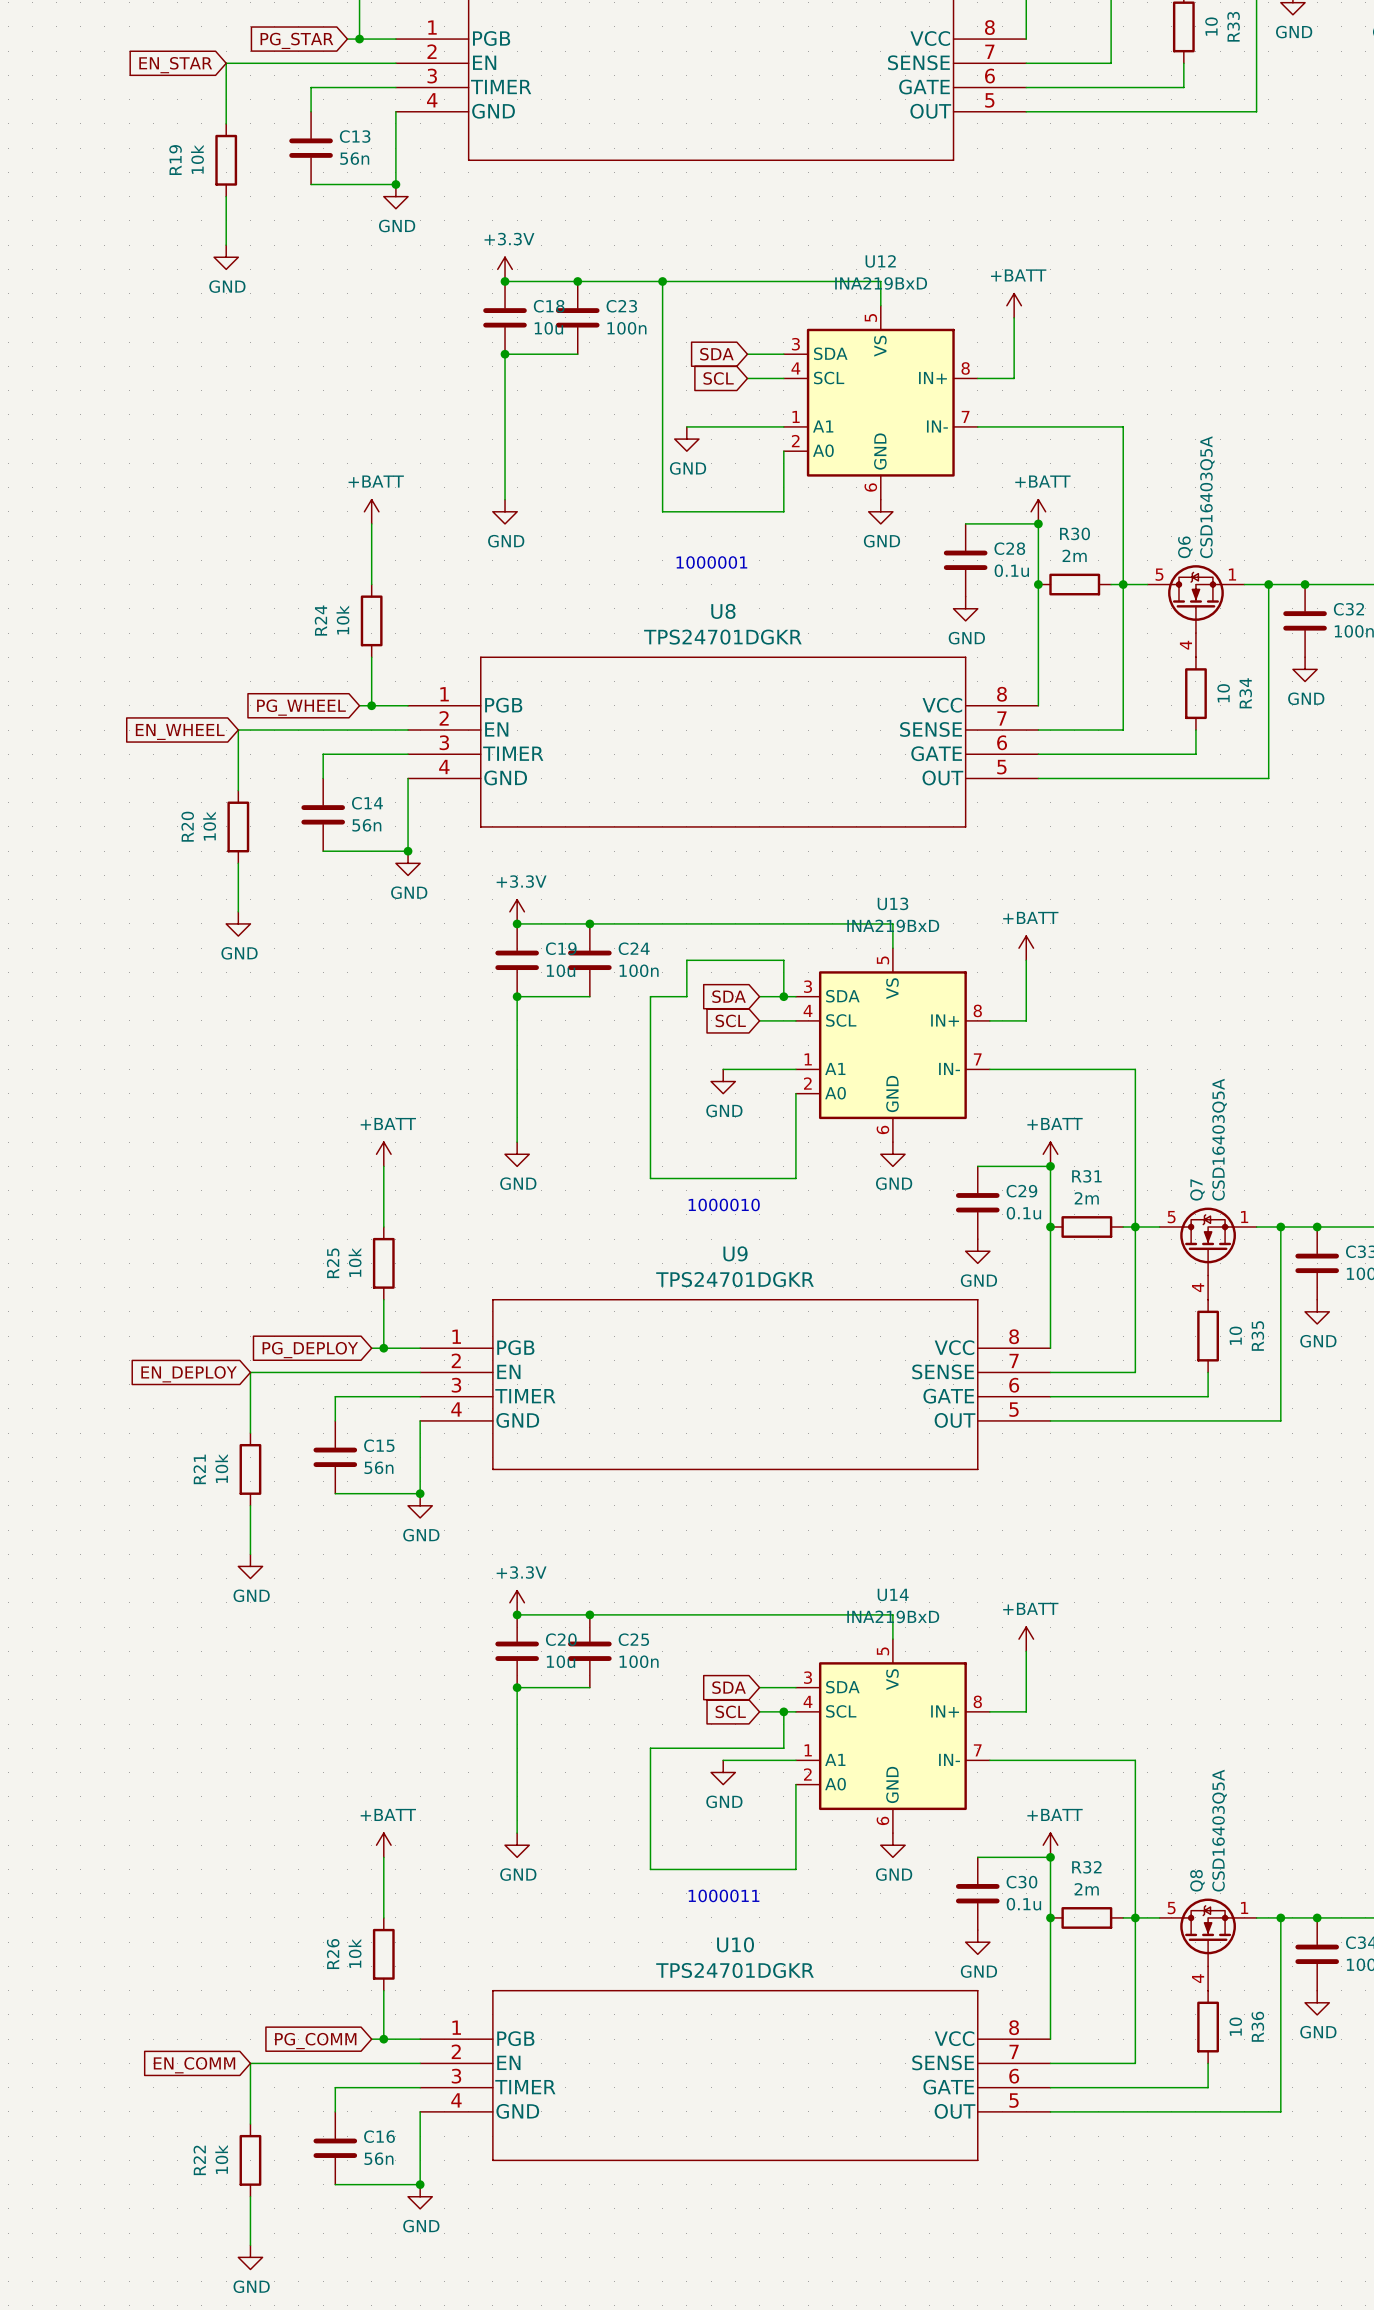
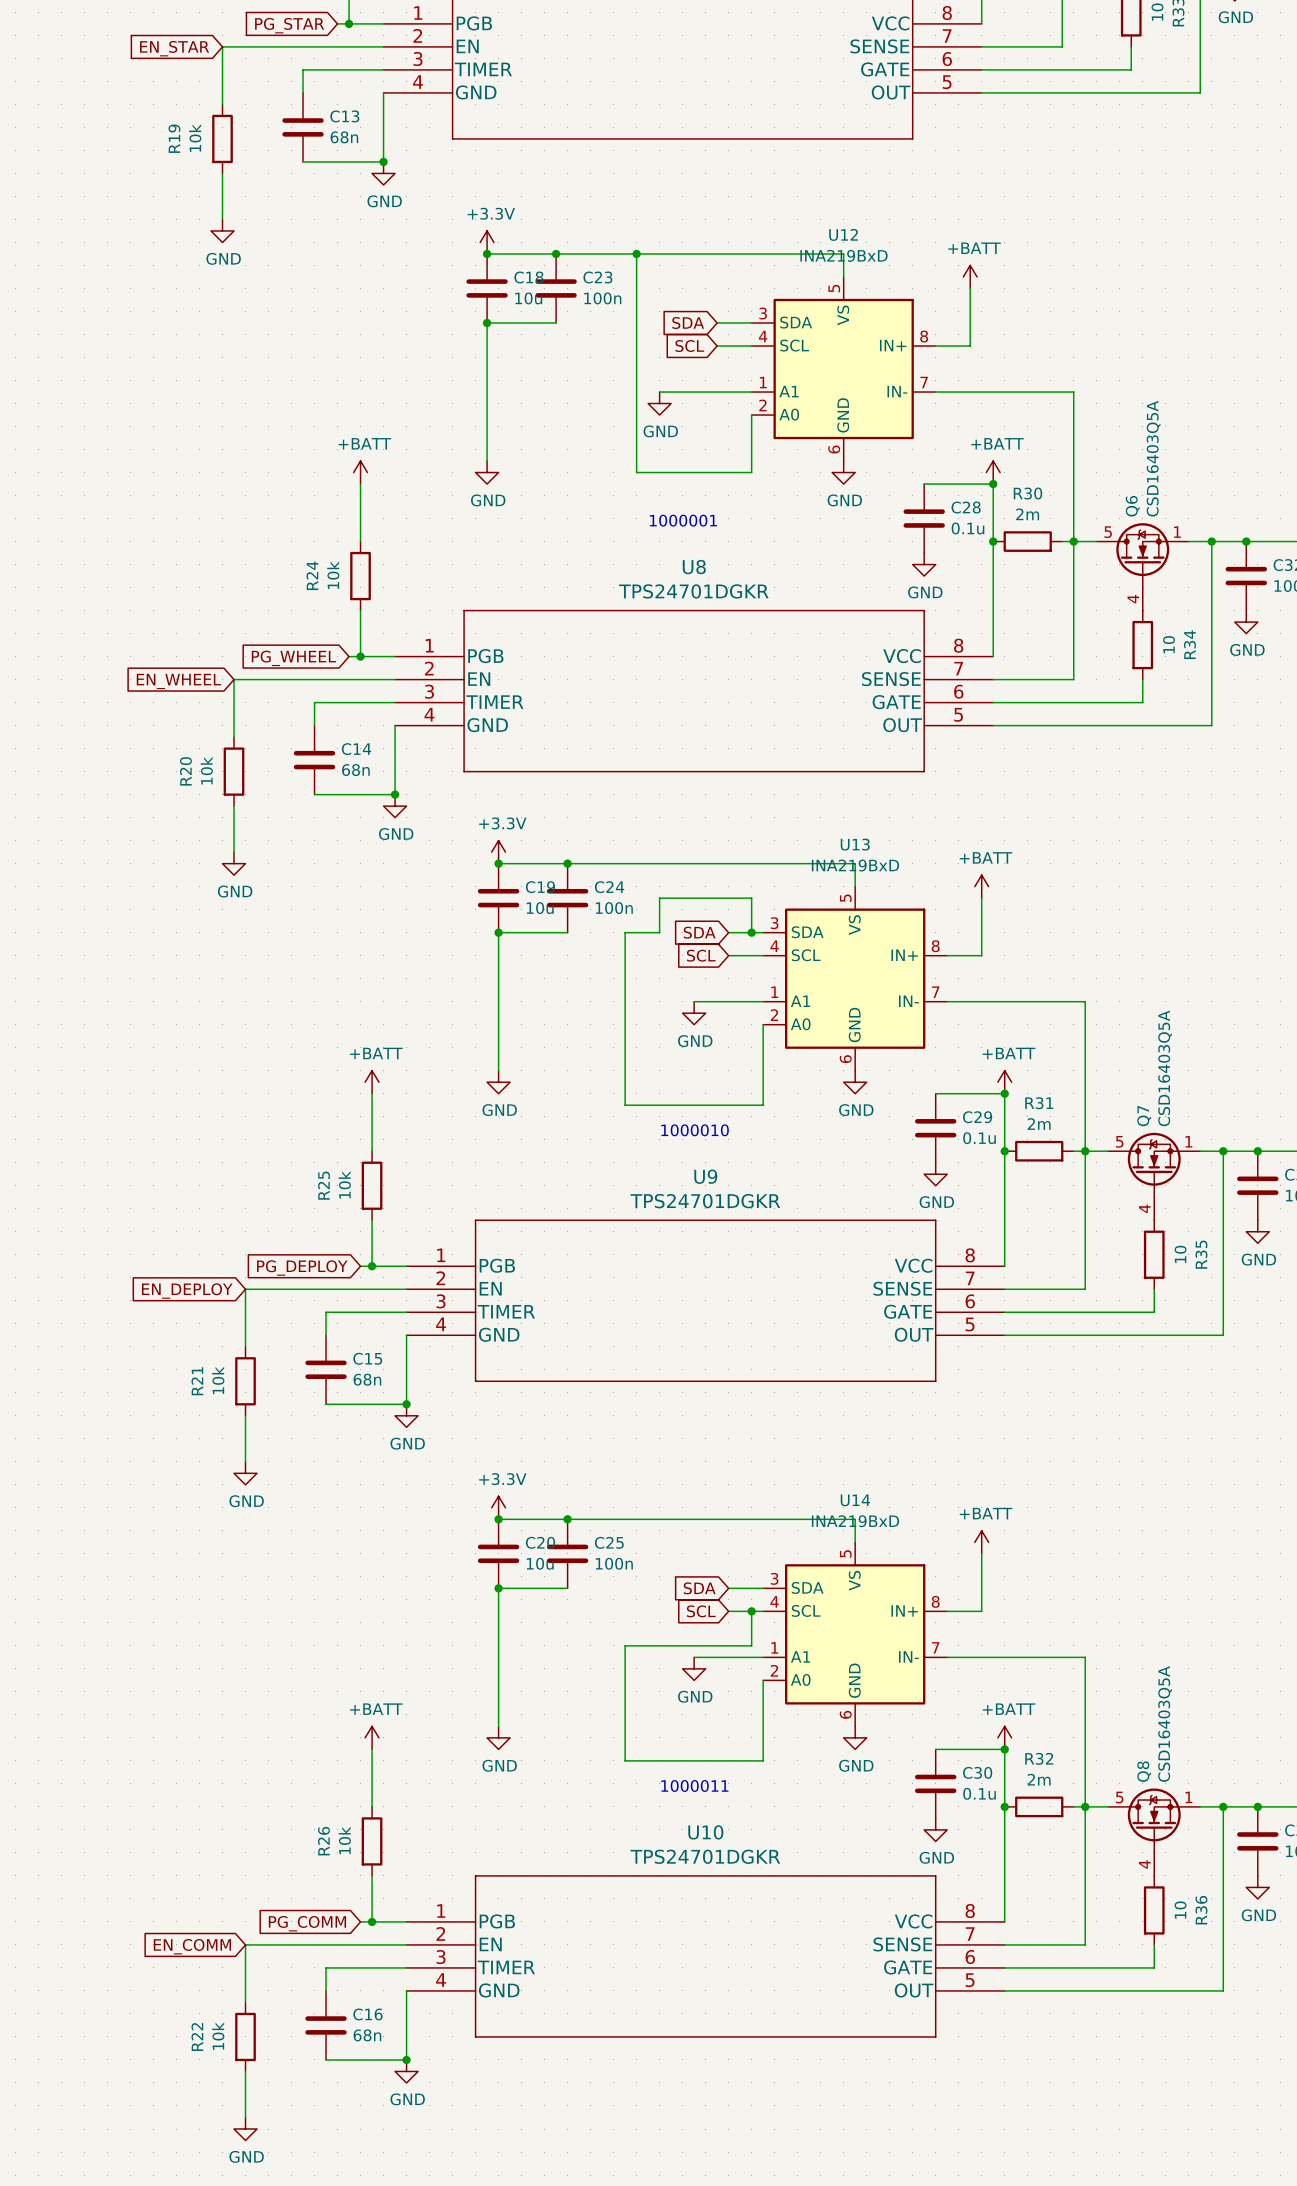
C13 value: 56n (354, 158) -> 68n (344, 137)
C14 value: 56n (366, 825) -> 68n (355, 770)
C15 value: 56n (378, 1467) -> 68n (367, 1379)
C16 value: 56n (378, 2158) -> 68n (367, 2035)

